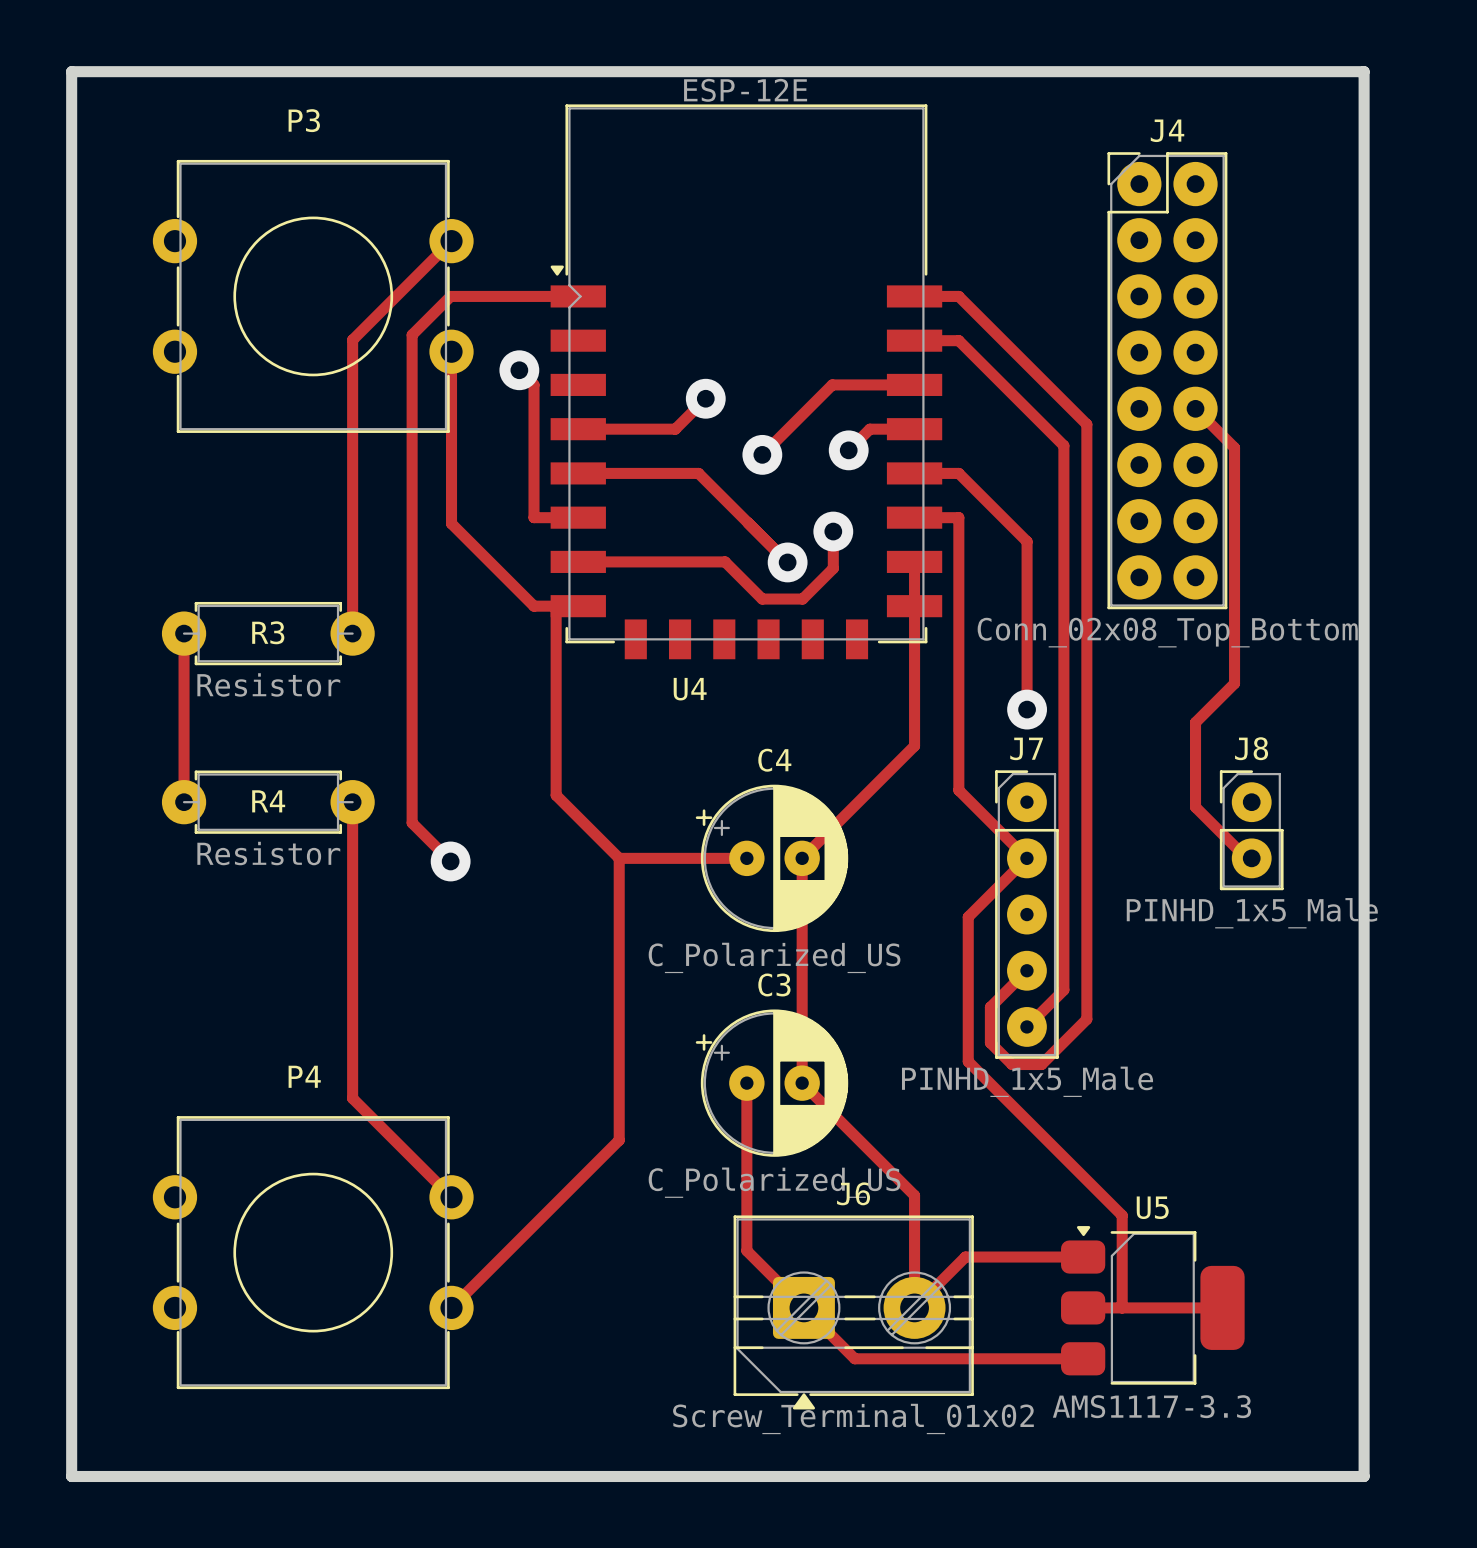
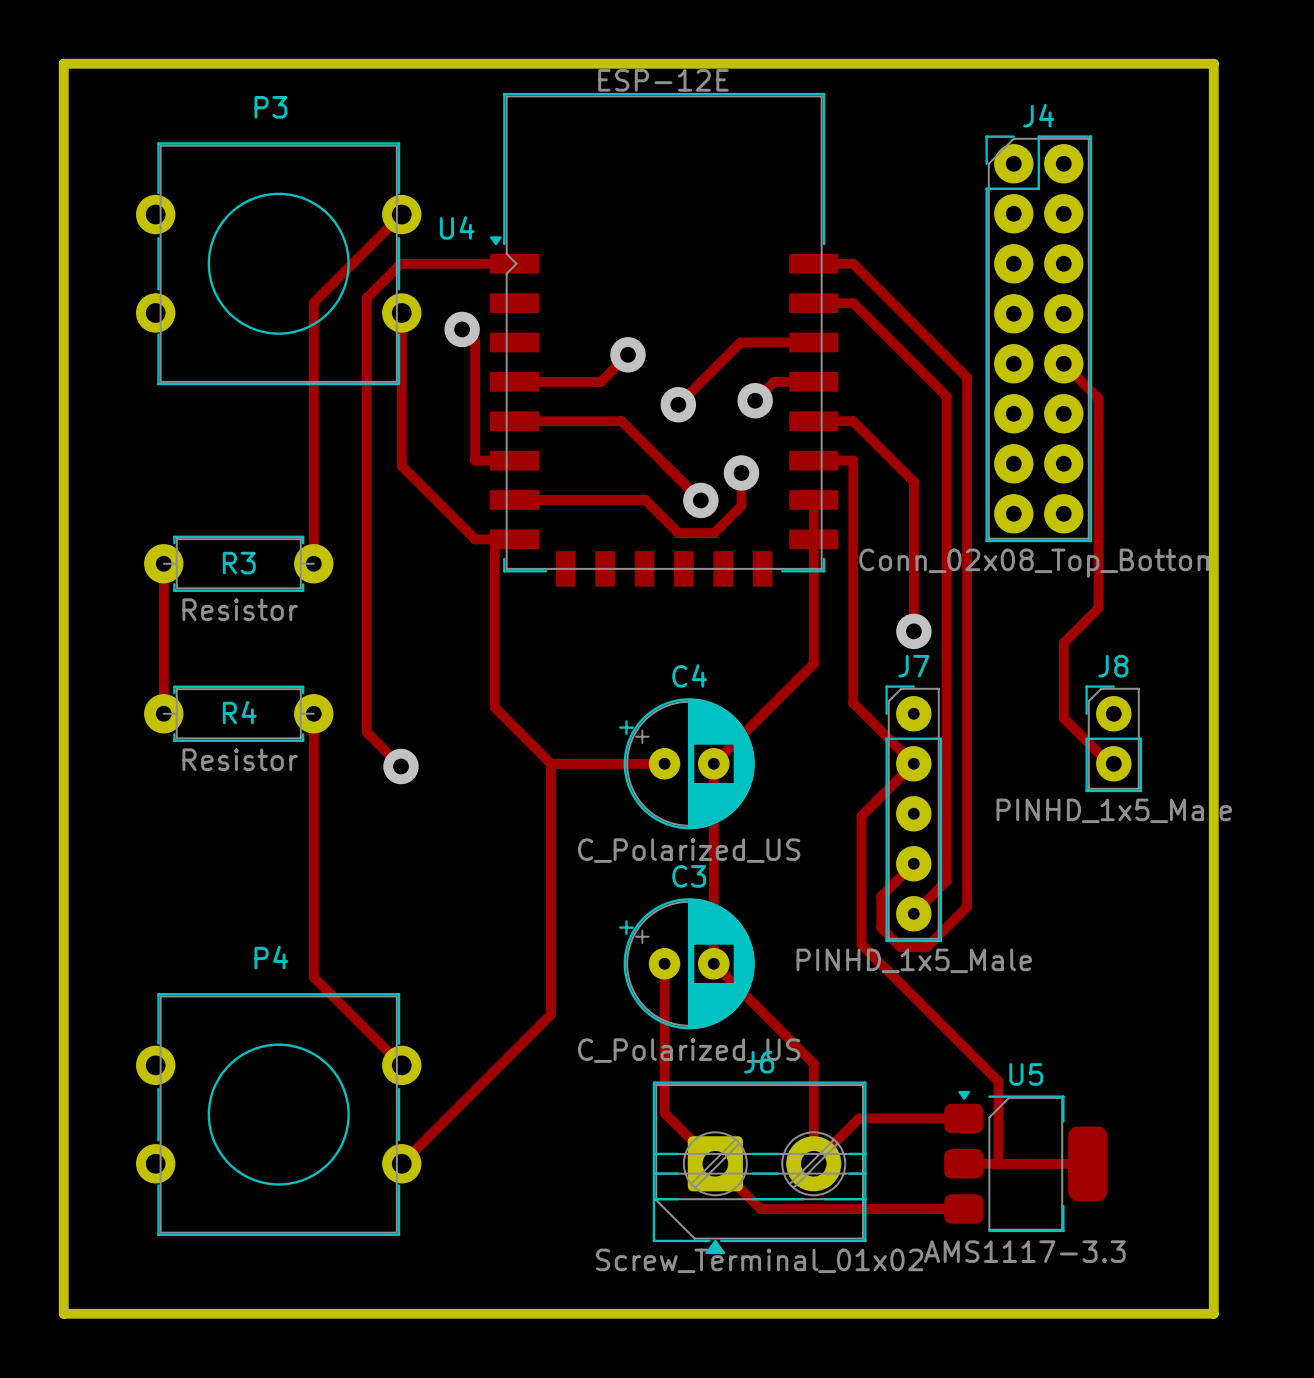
U4 name position: U4 (690, 689) -> U4 (457, 227)

